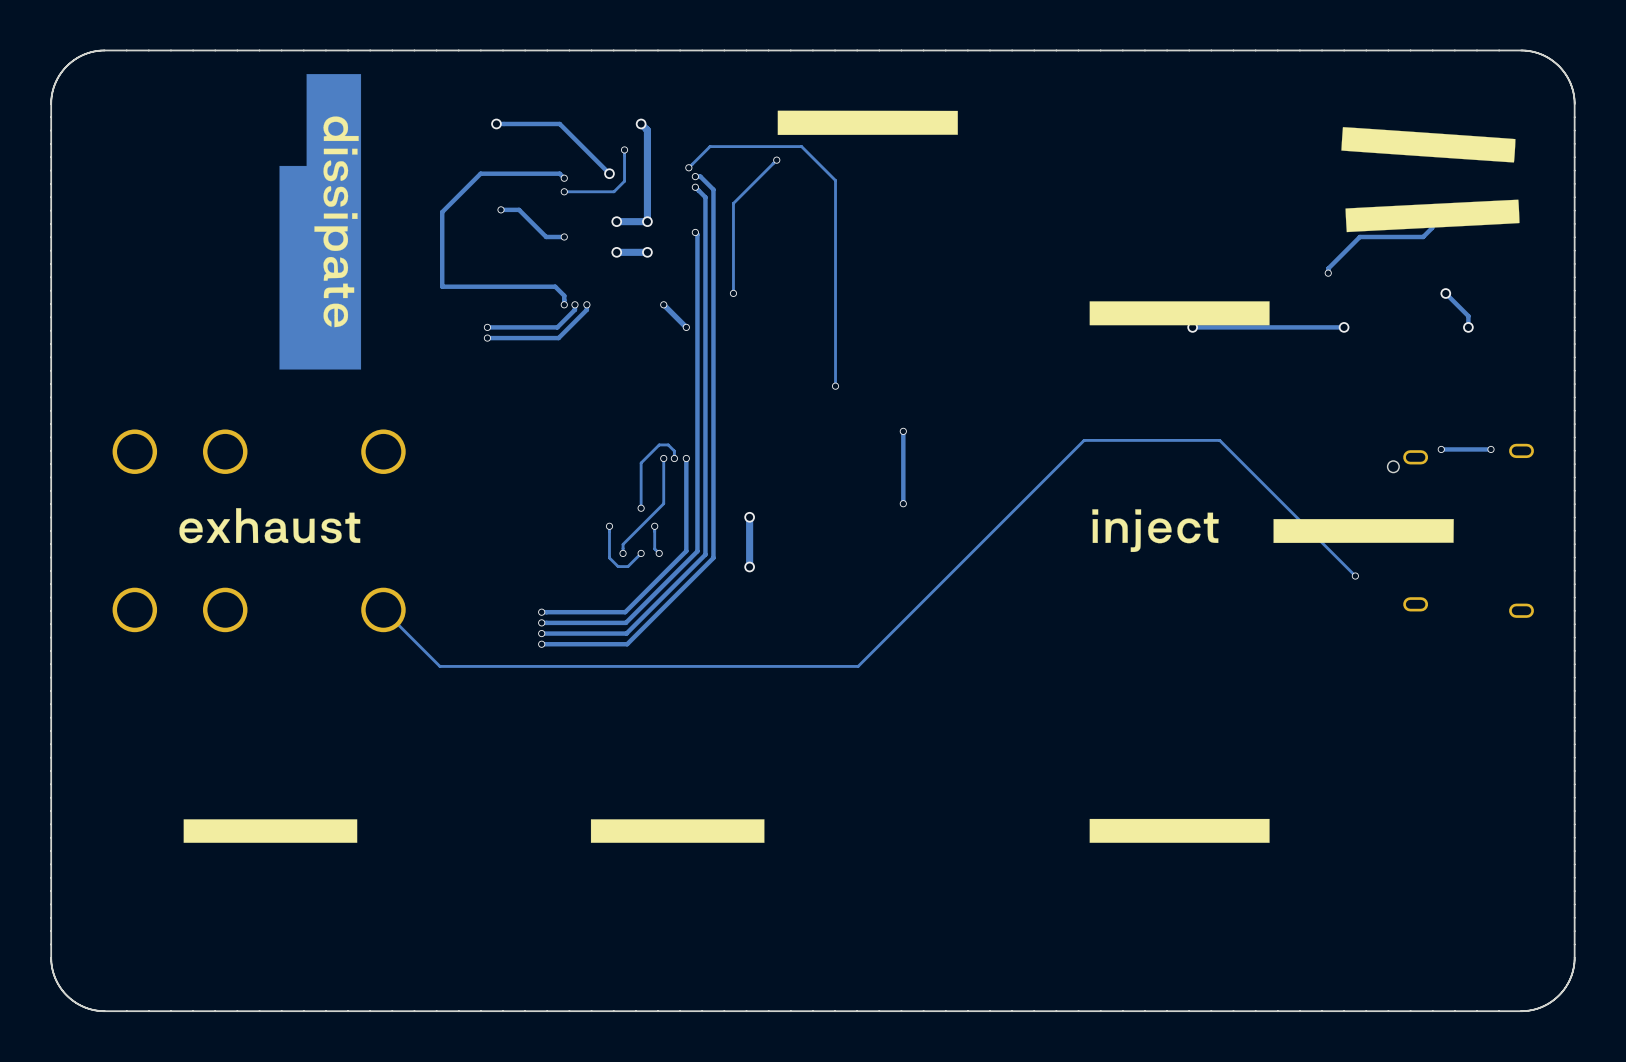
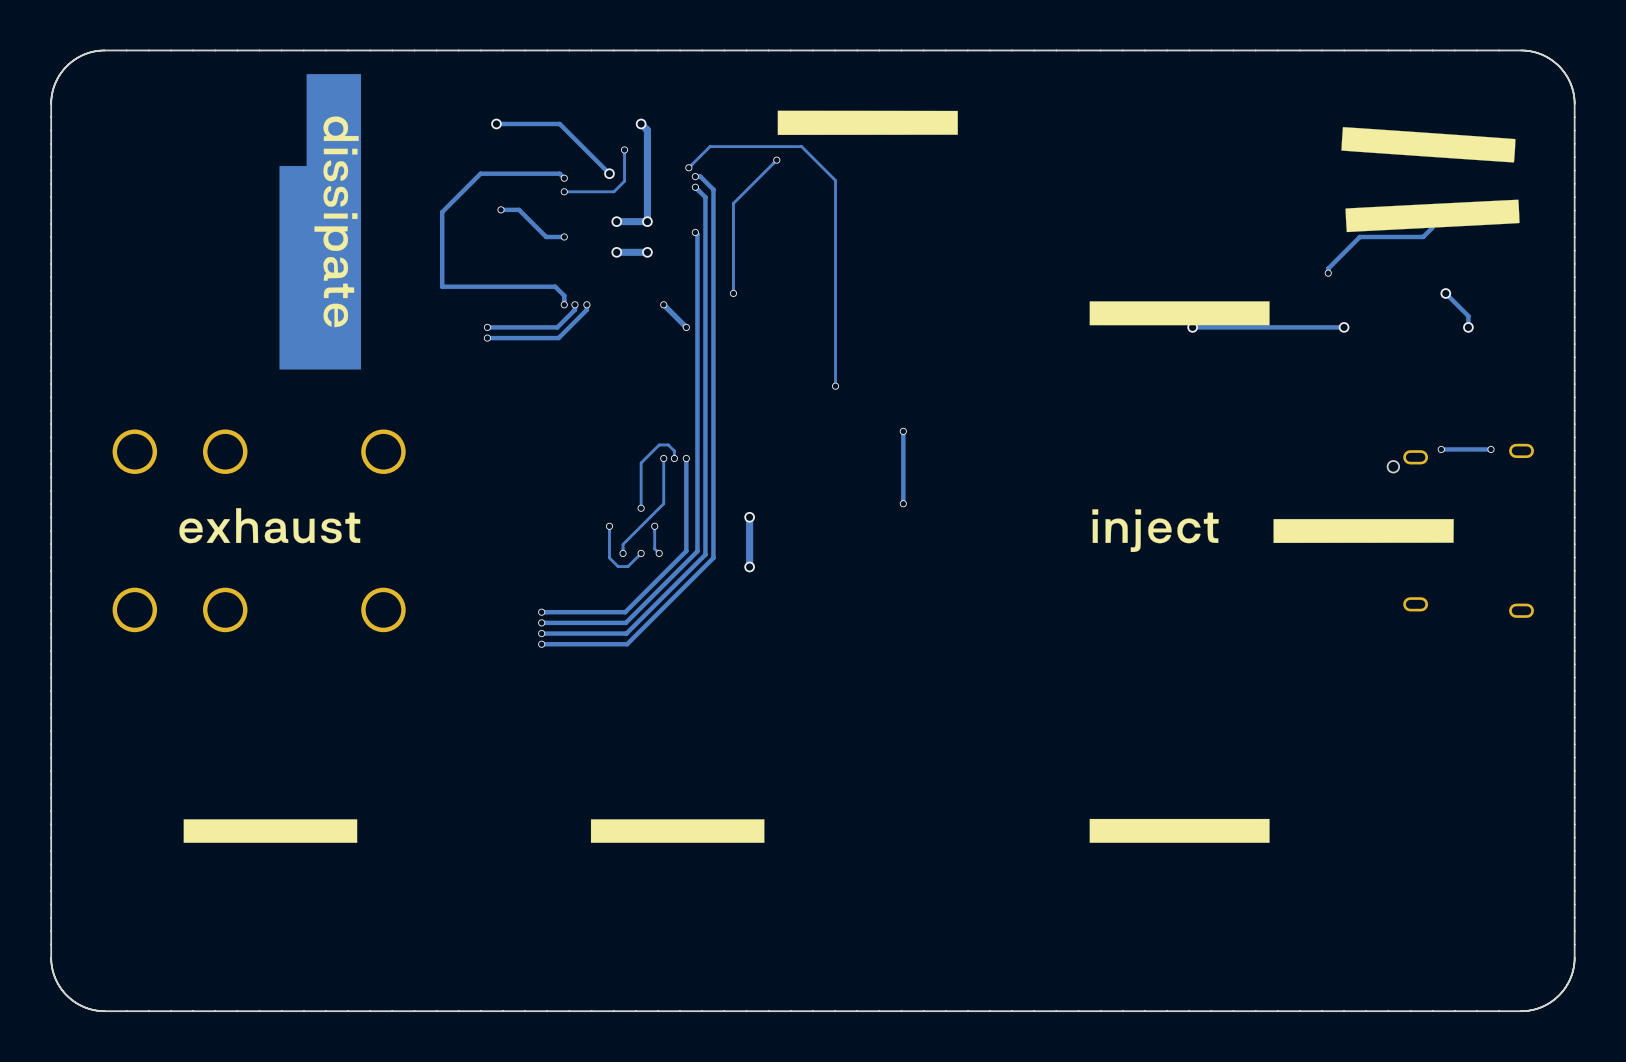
track: (1355, 576) (1219, 440) (1084, 440) (858, 666) (439, 666) (383, 609) -> none
via: (1355, 576) -> none

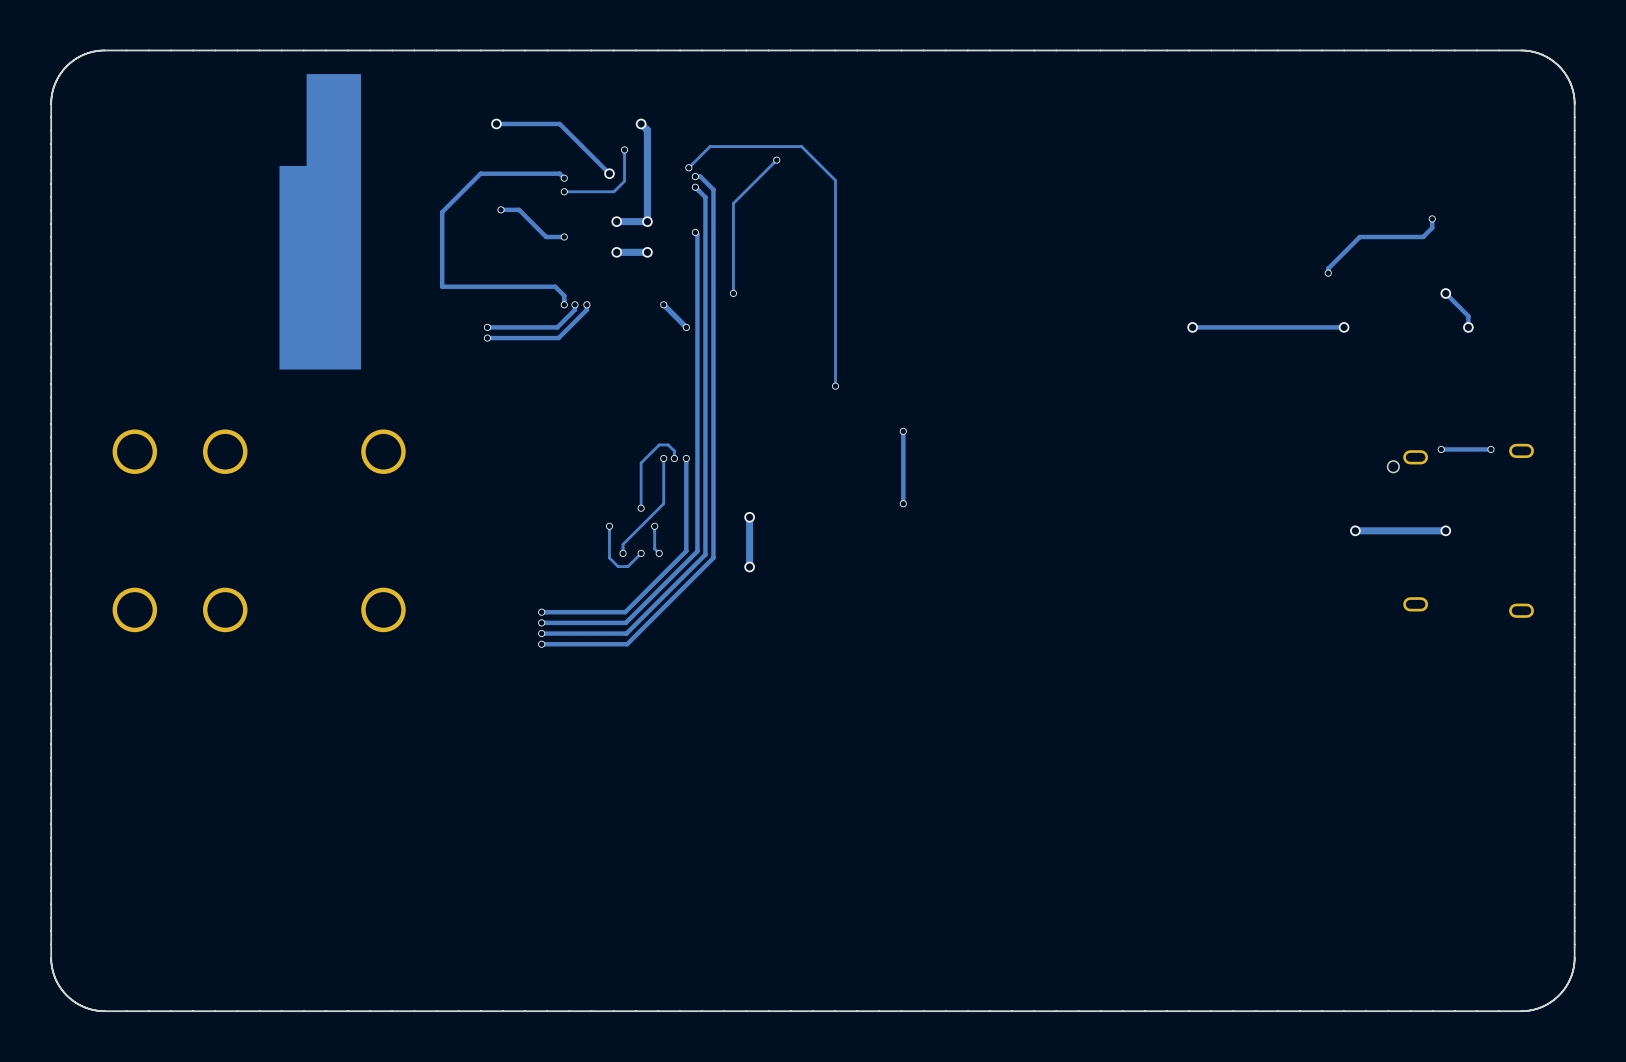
drawing: [179, 110, 1520, 843] -> none

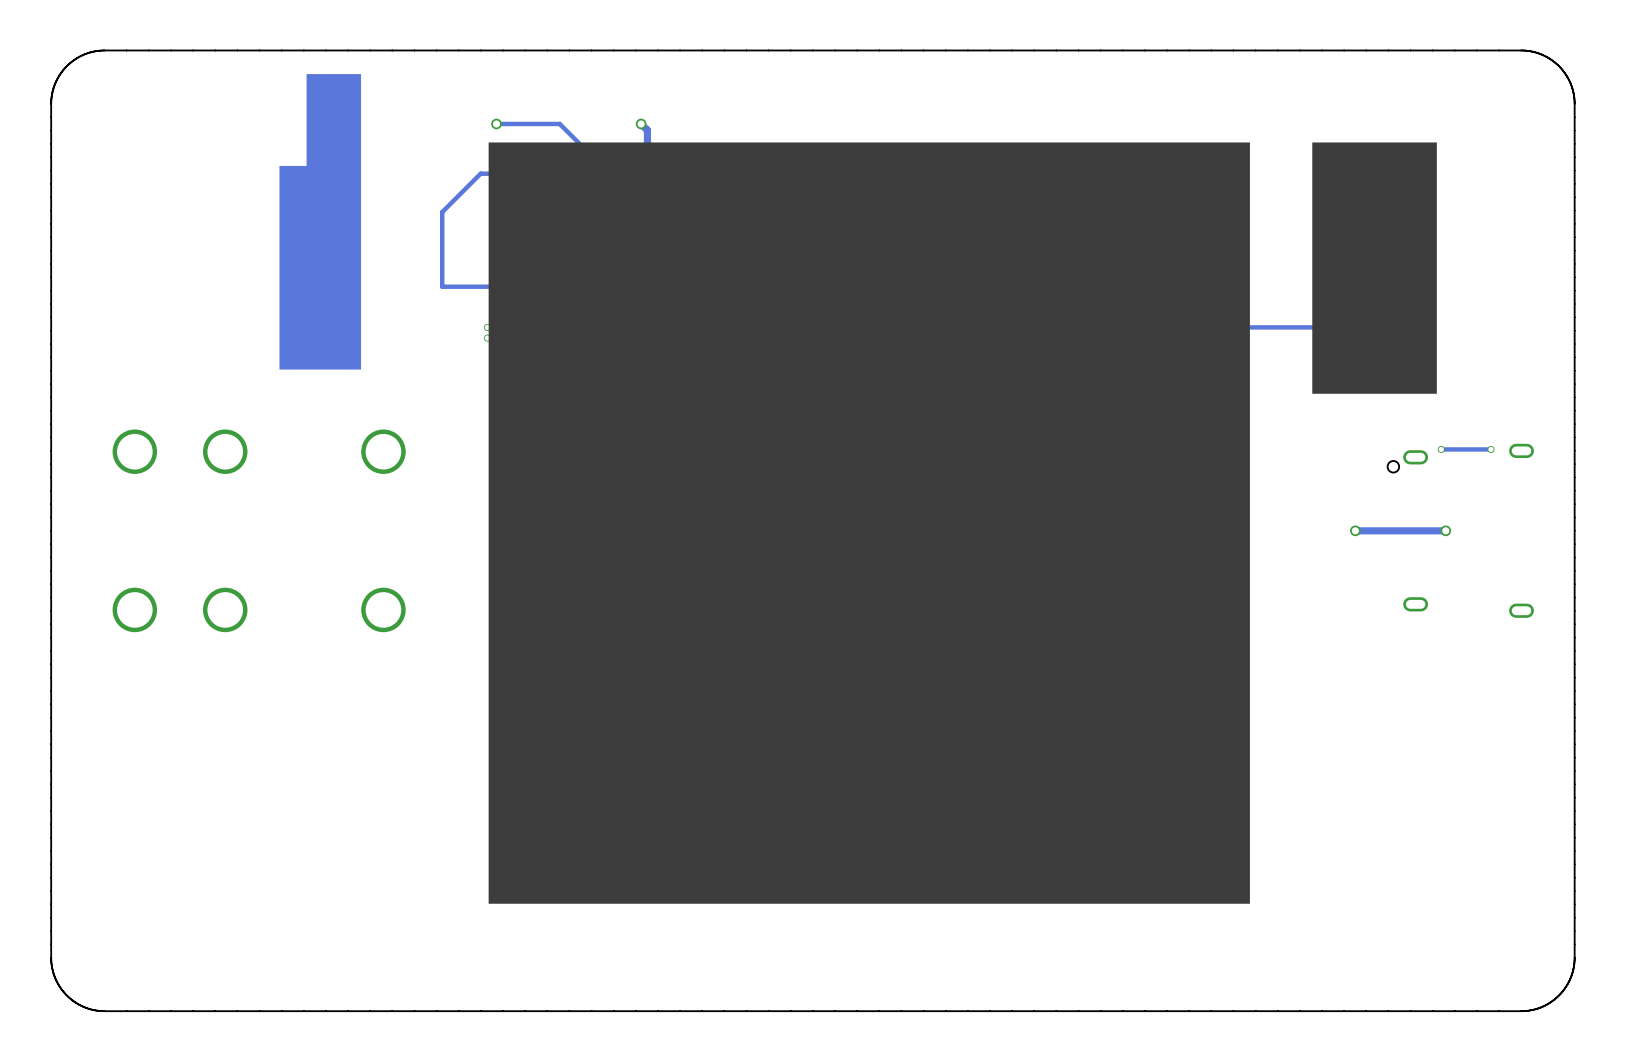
drawing: none -> [488, 142, 1437, 904]
track: (1445, 293) (1468, 316) (1468, 327) -> none
via: (1445, 293) -> none
via: (1468, 327) -> none

